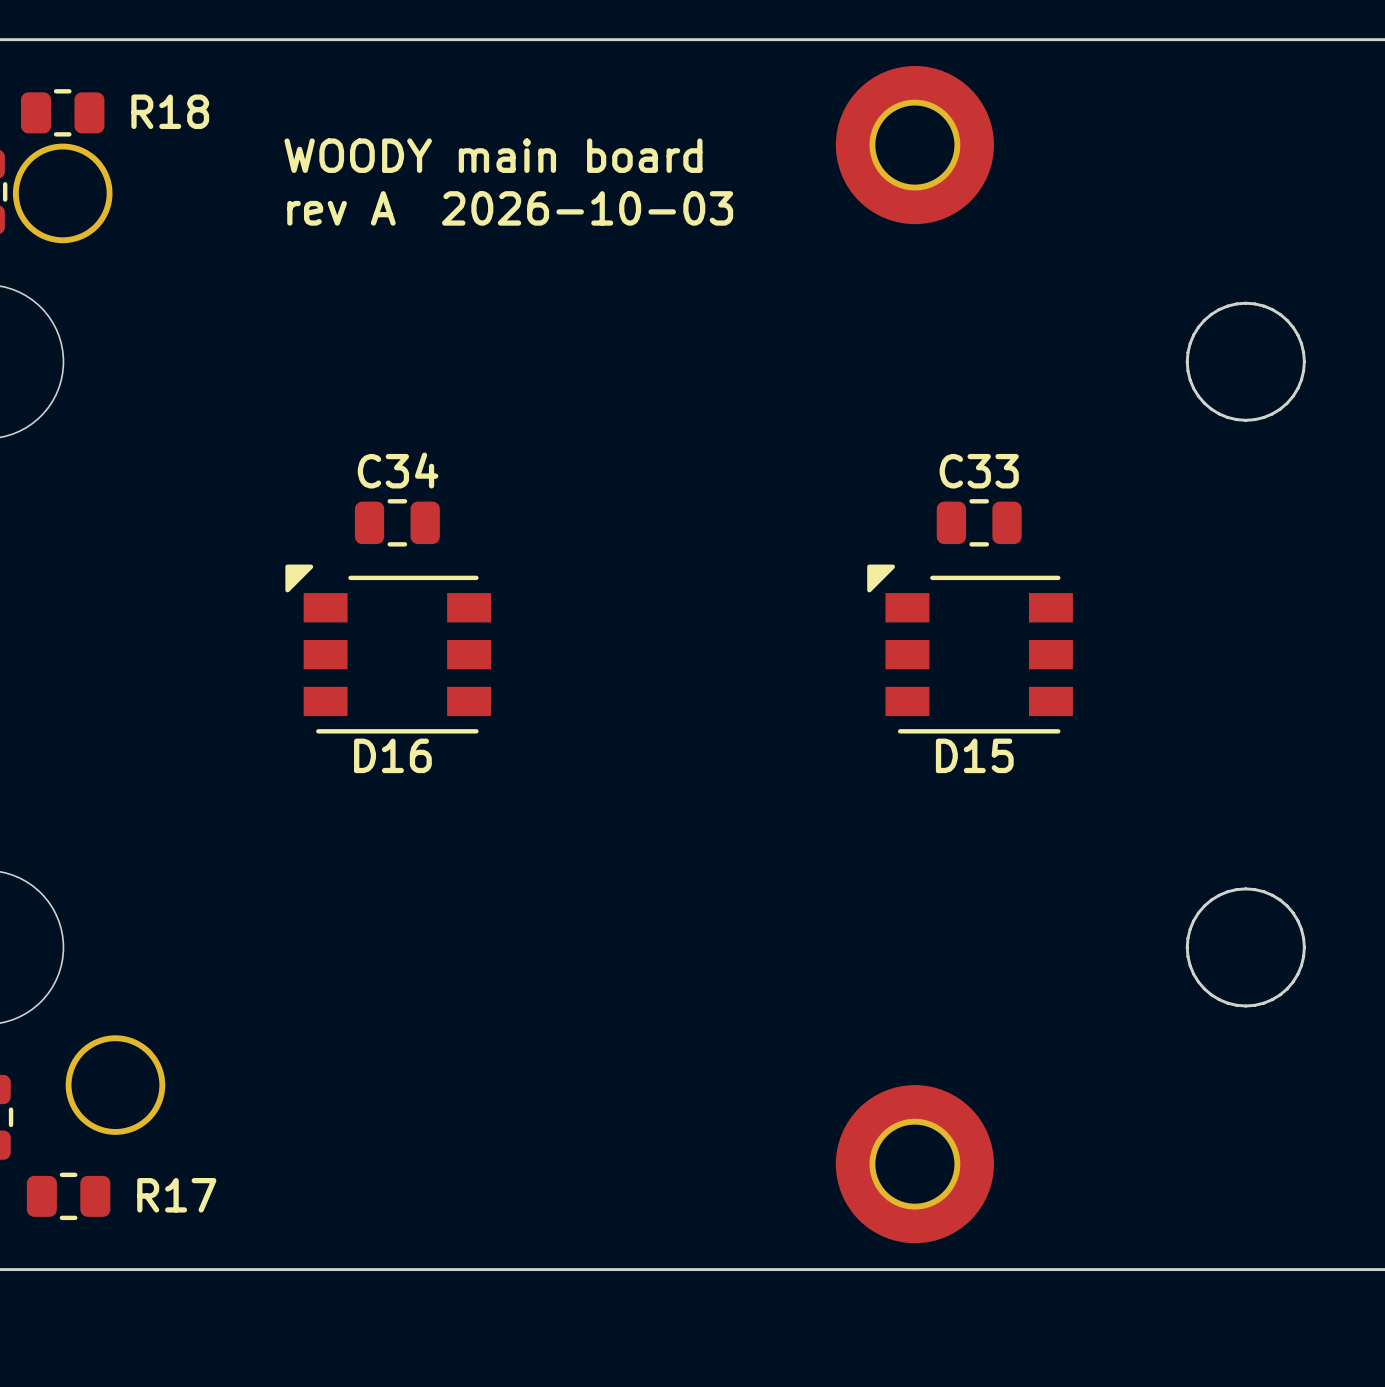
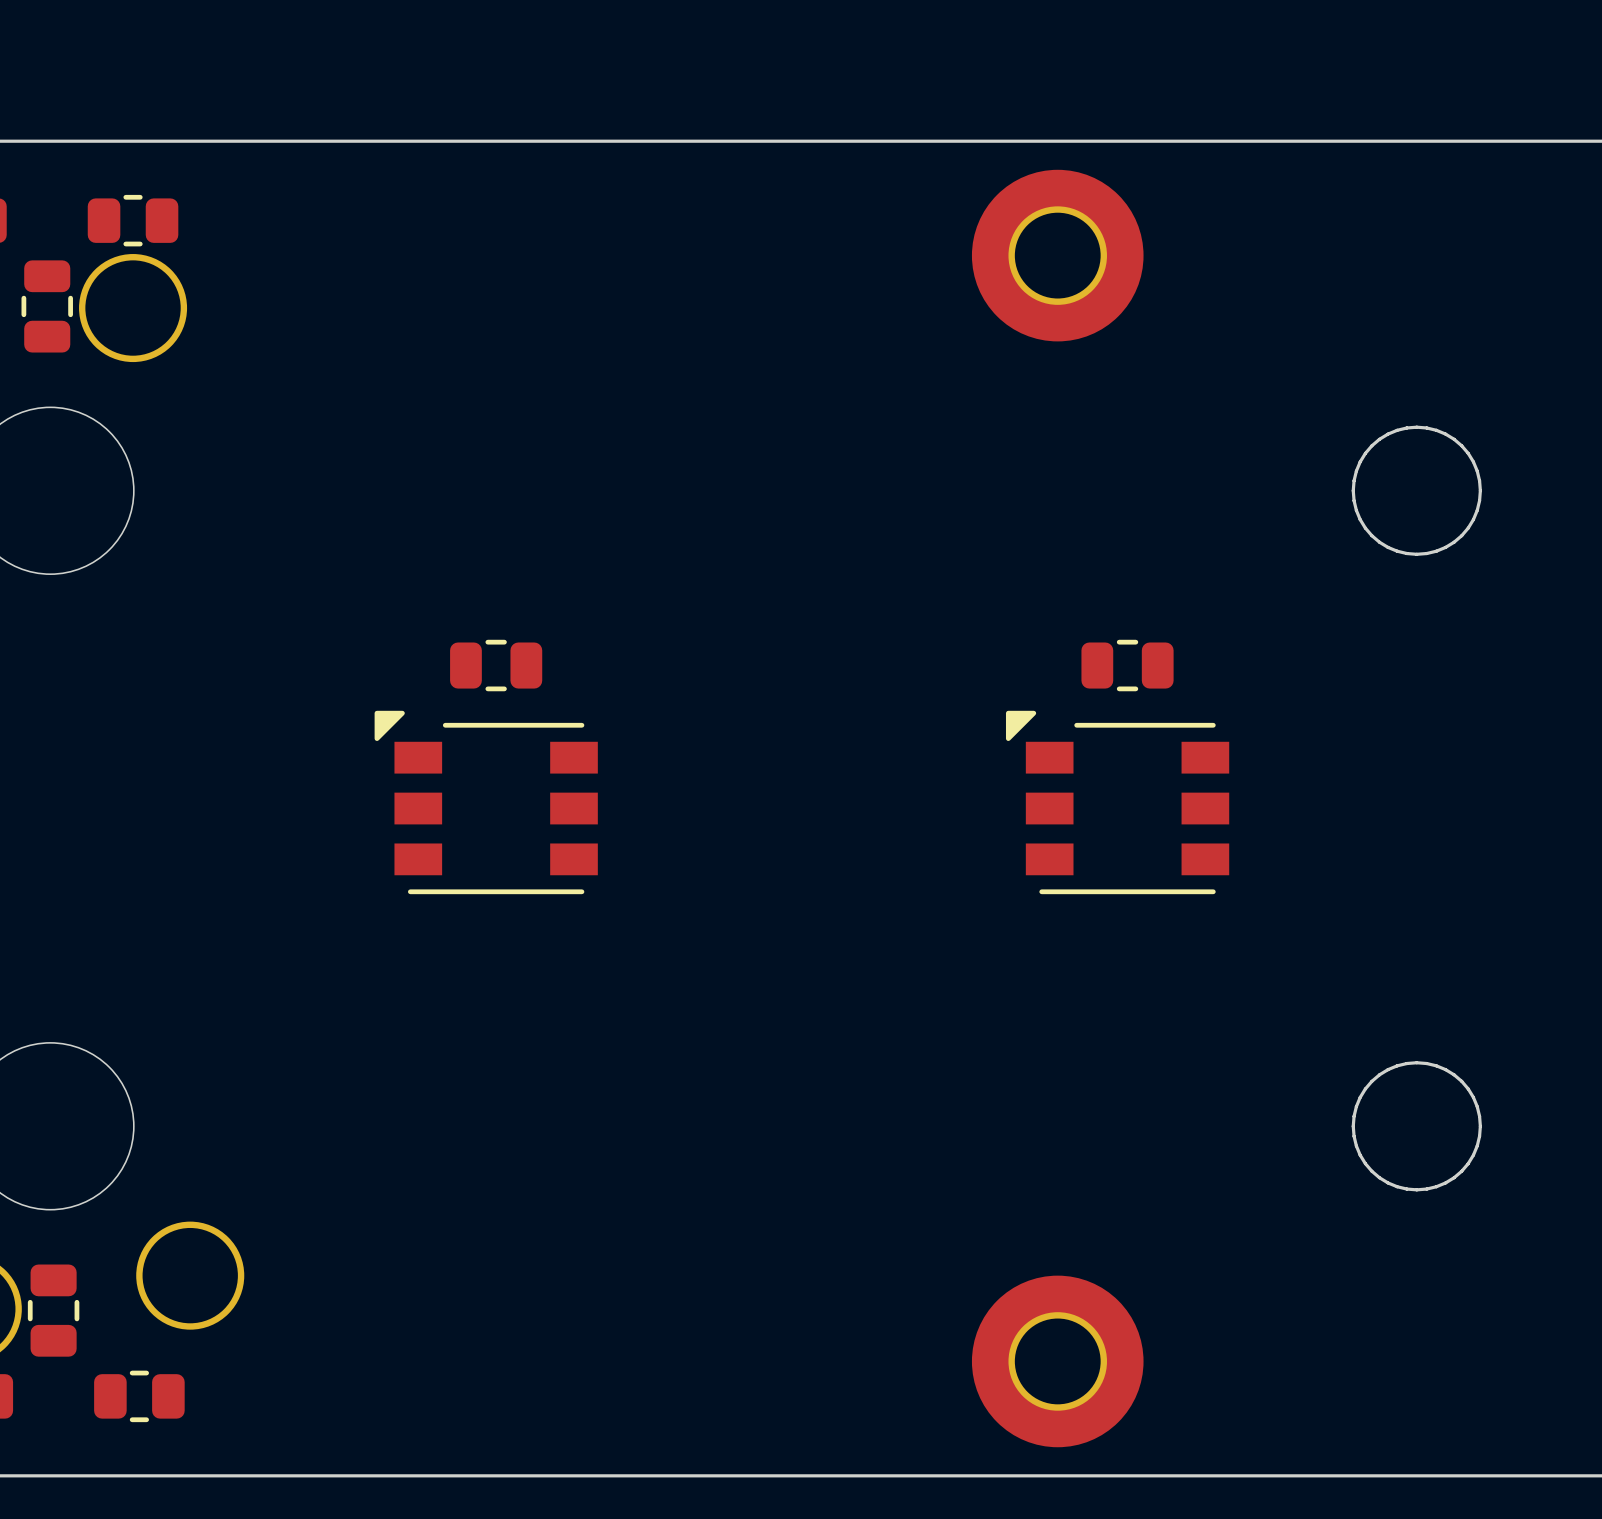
text: R18 (170, 111) -> none
text: WOODY main board (493, 155) -> none
text: rev A 2026-10-03 (510, 208) -> none
text: C34 (398, 470) -> none
text: C33 (979, 471) -> none
text: D16 (392, 755) -> none
text: D15 (974, 755) -> none
text: R17 (176, 1195) -> none

